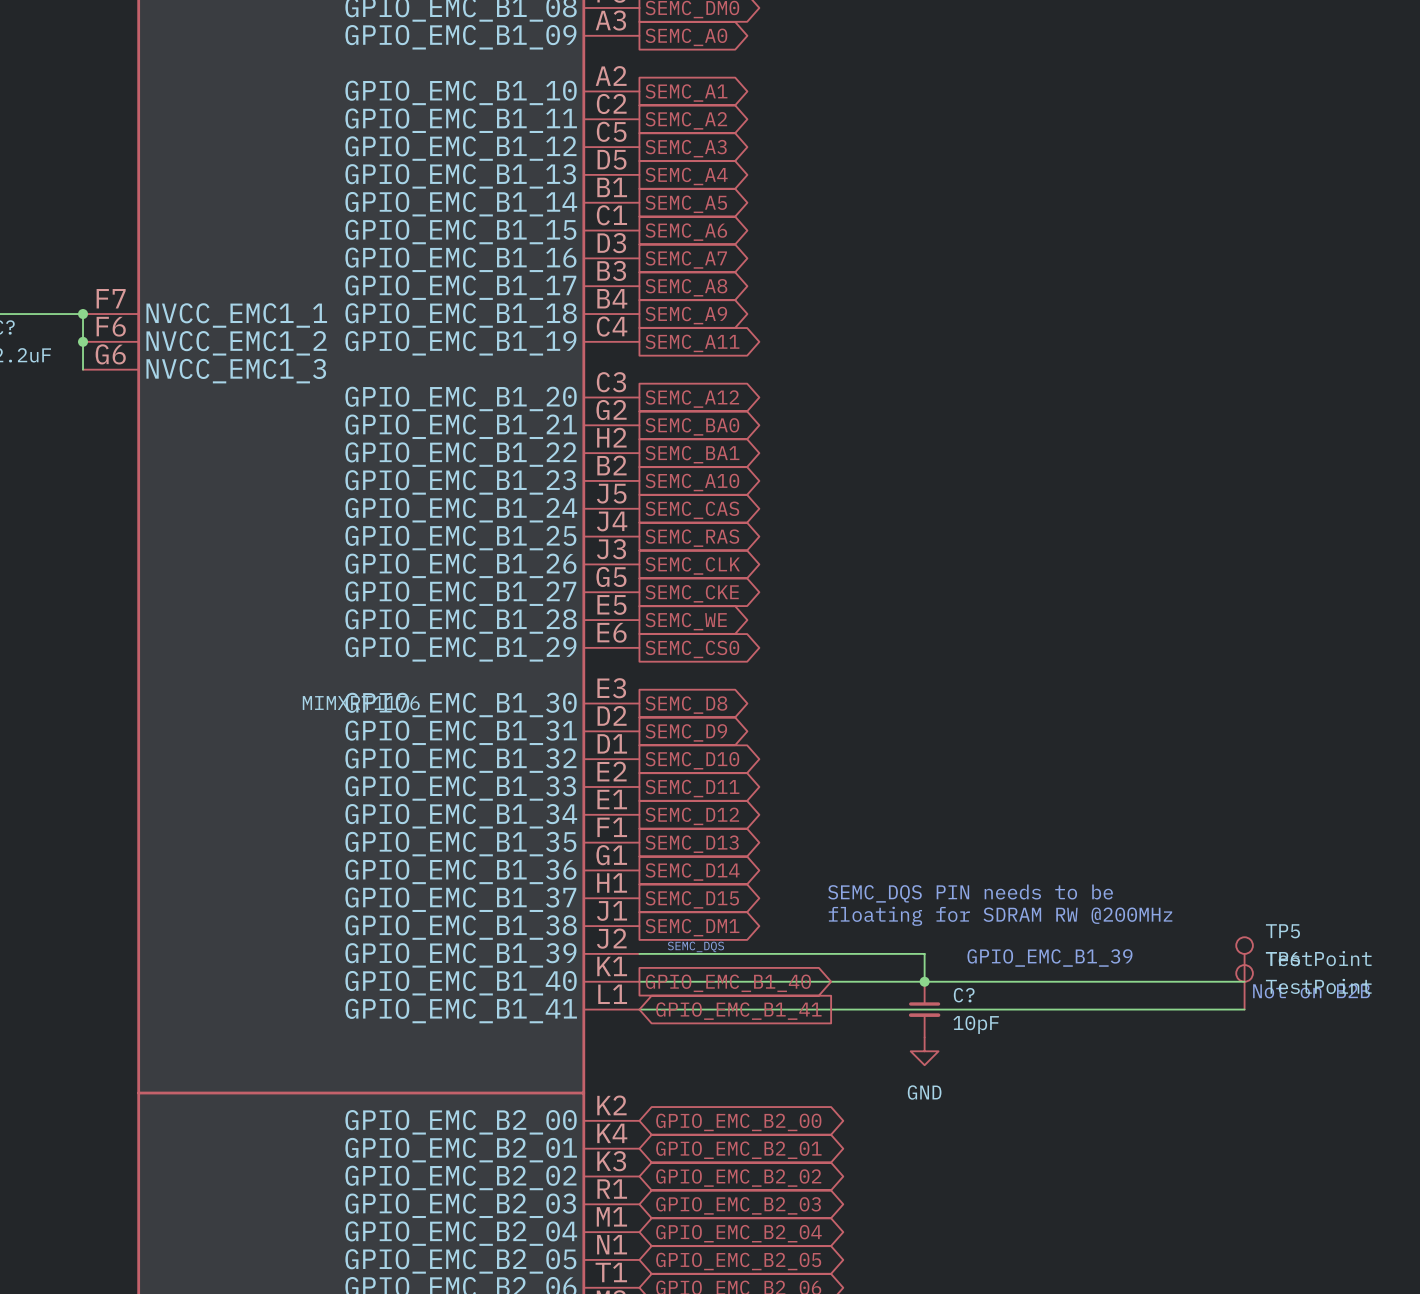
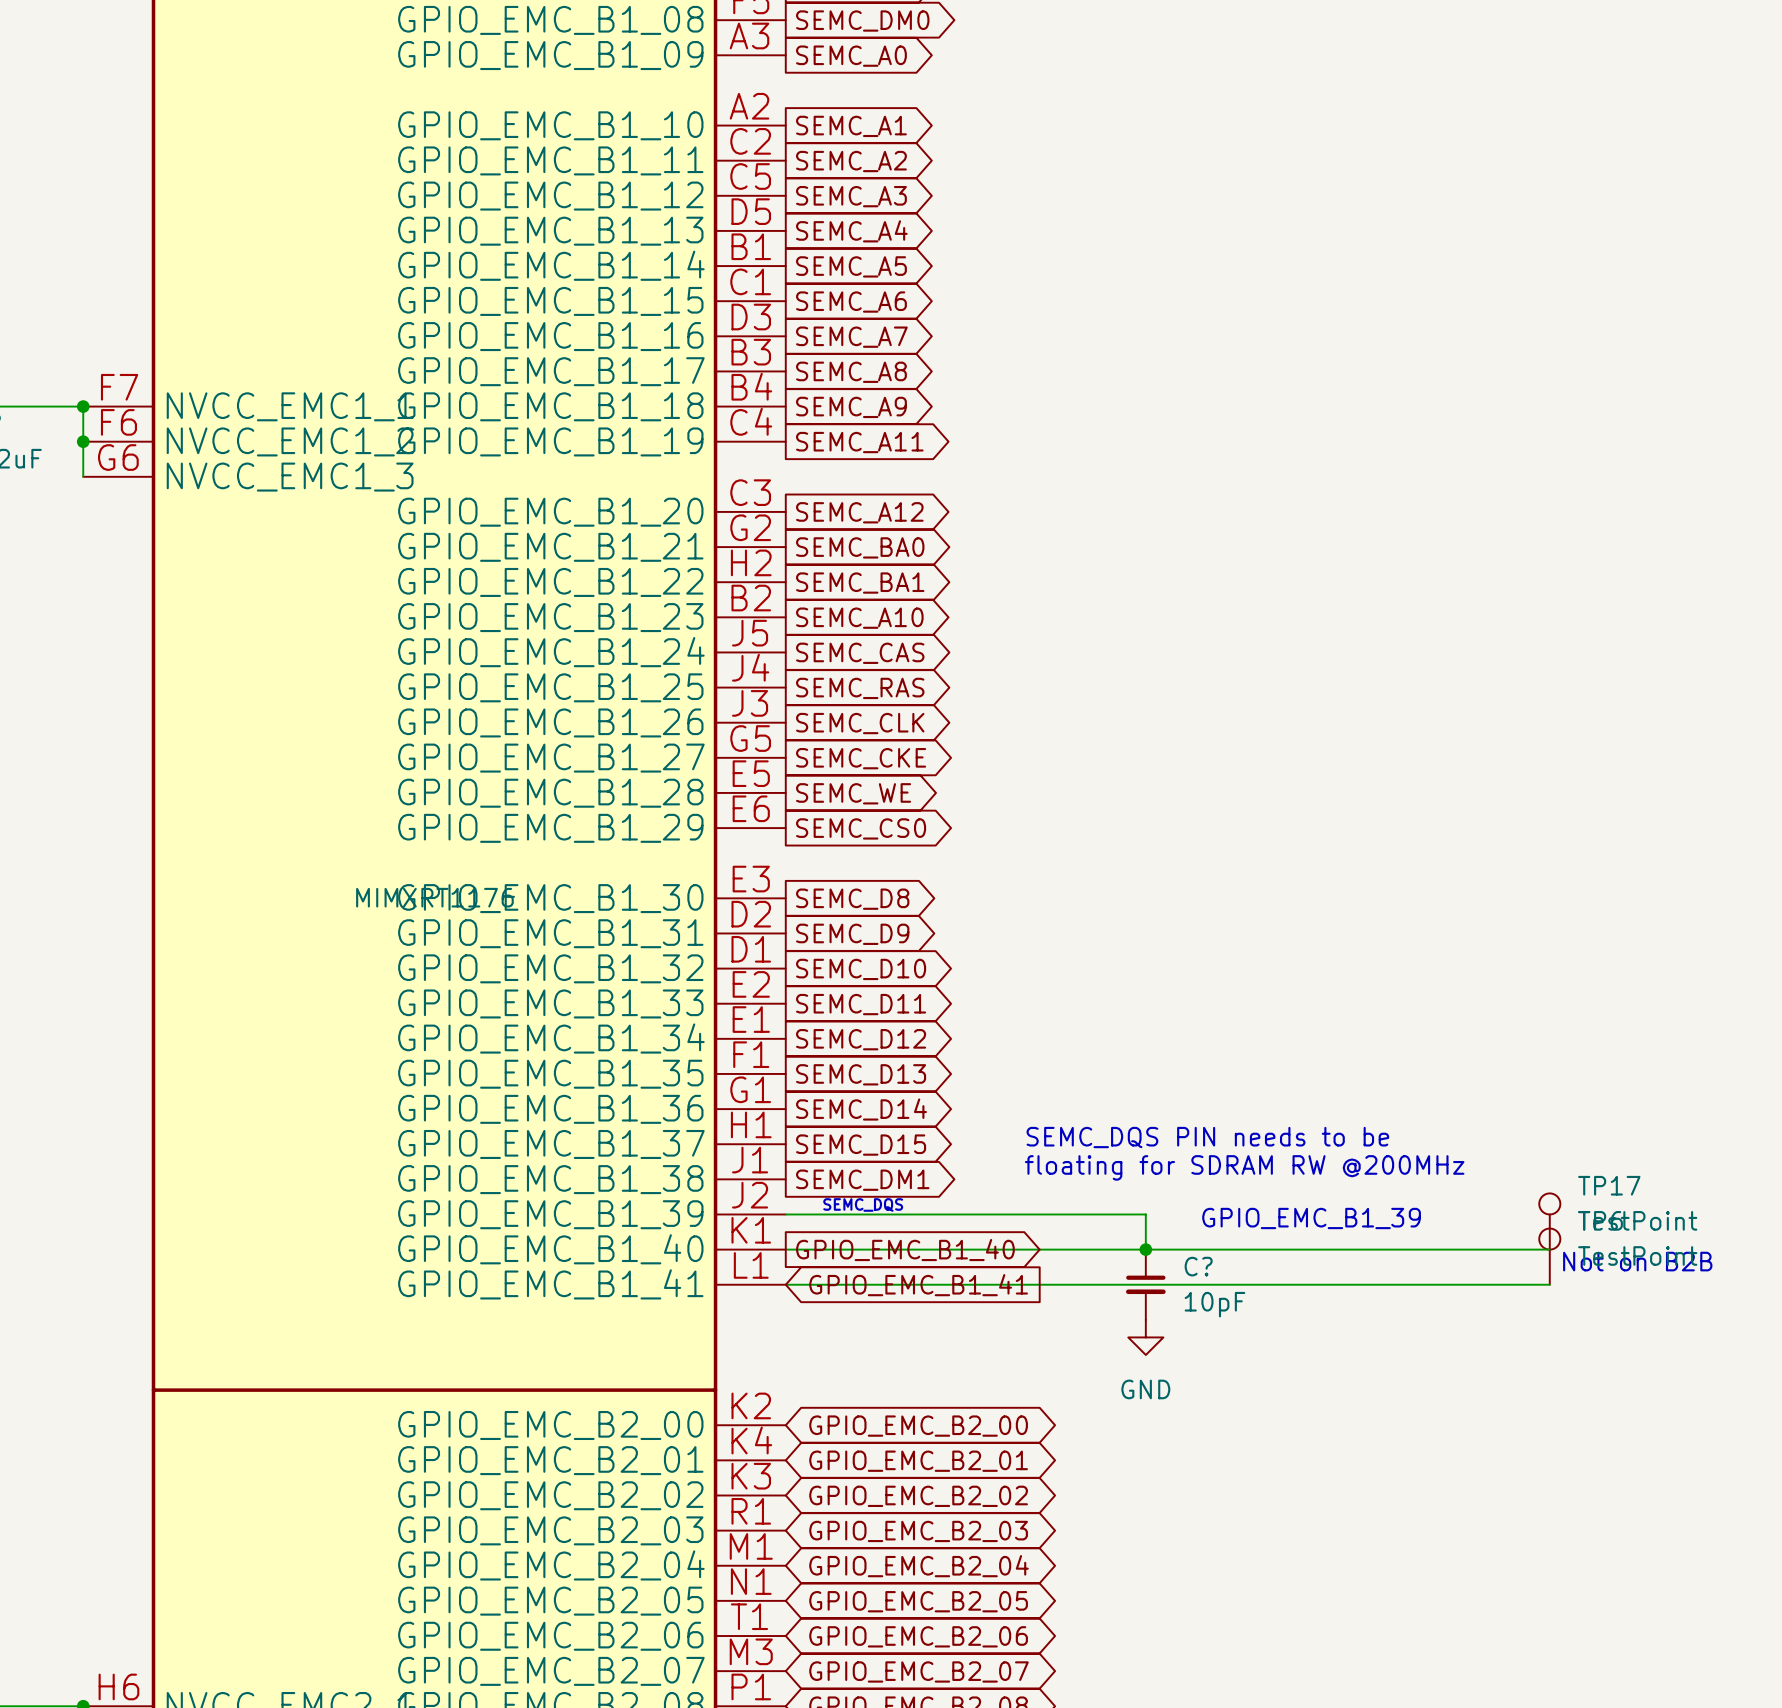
TP5 name: TP5 (1282, 931) -> TP17 (1609, 1185)

